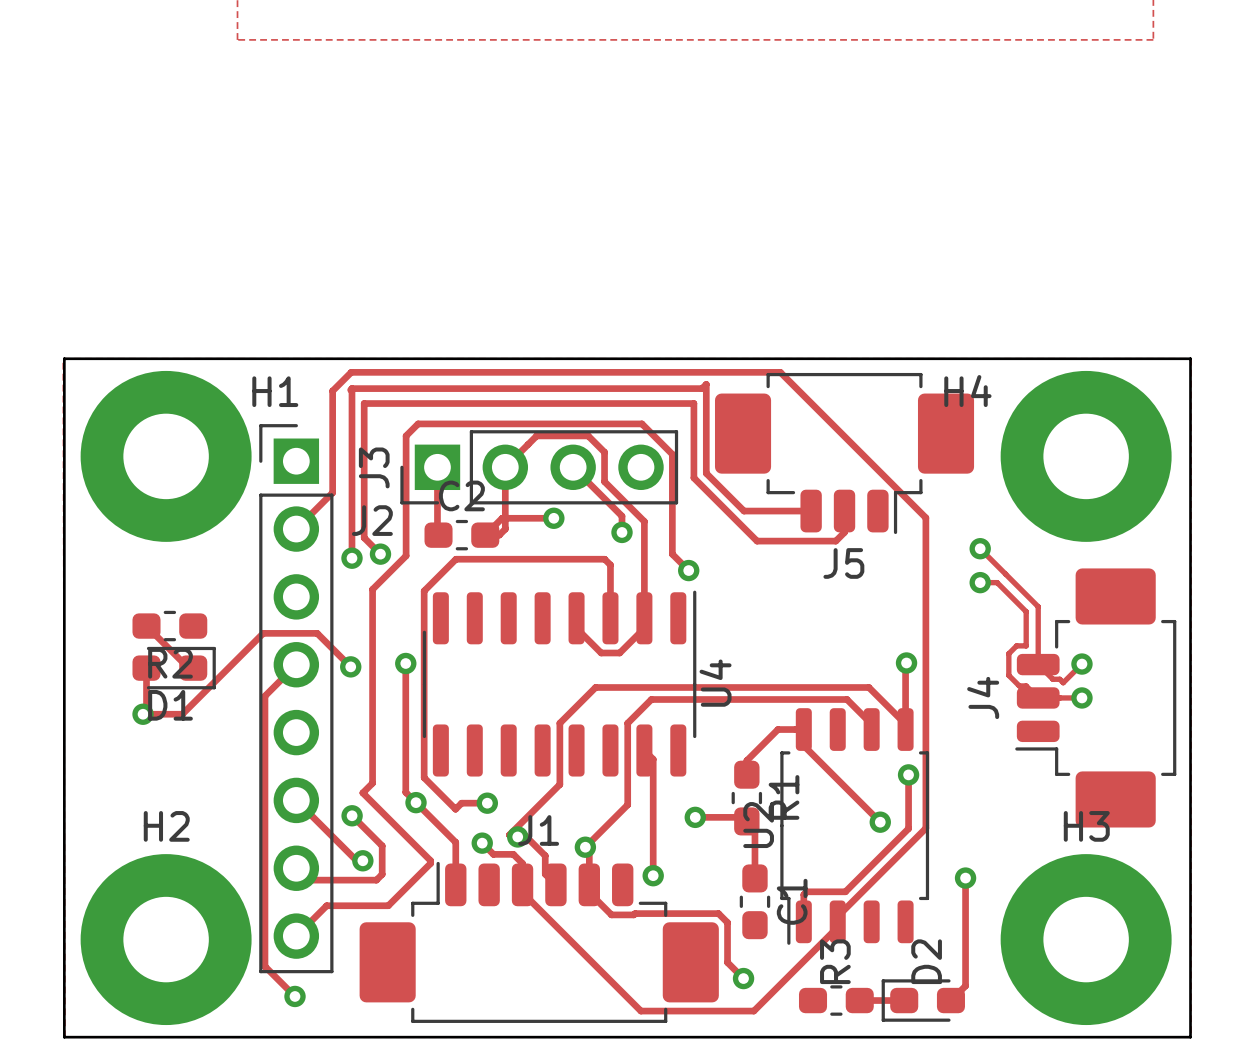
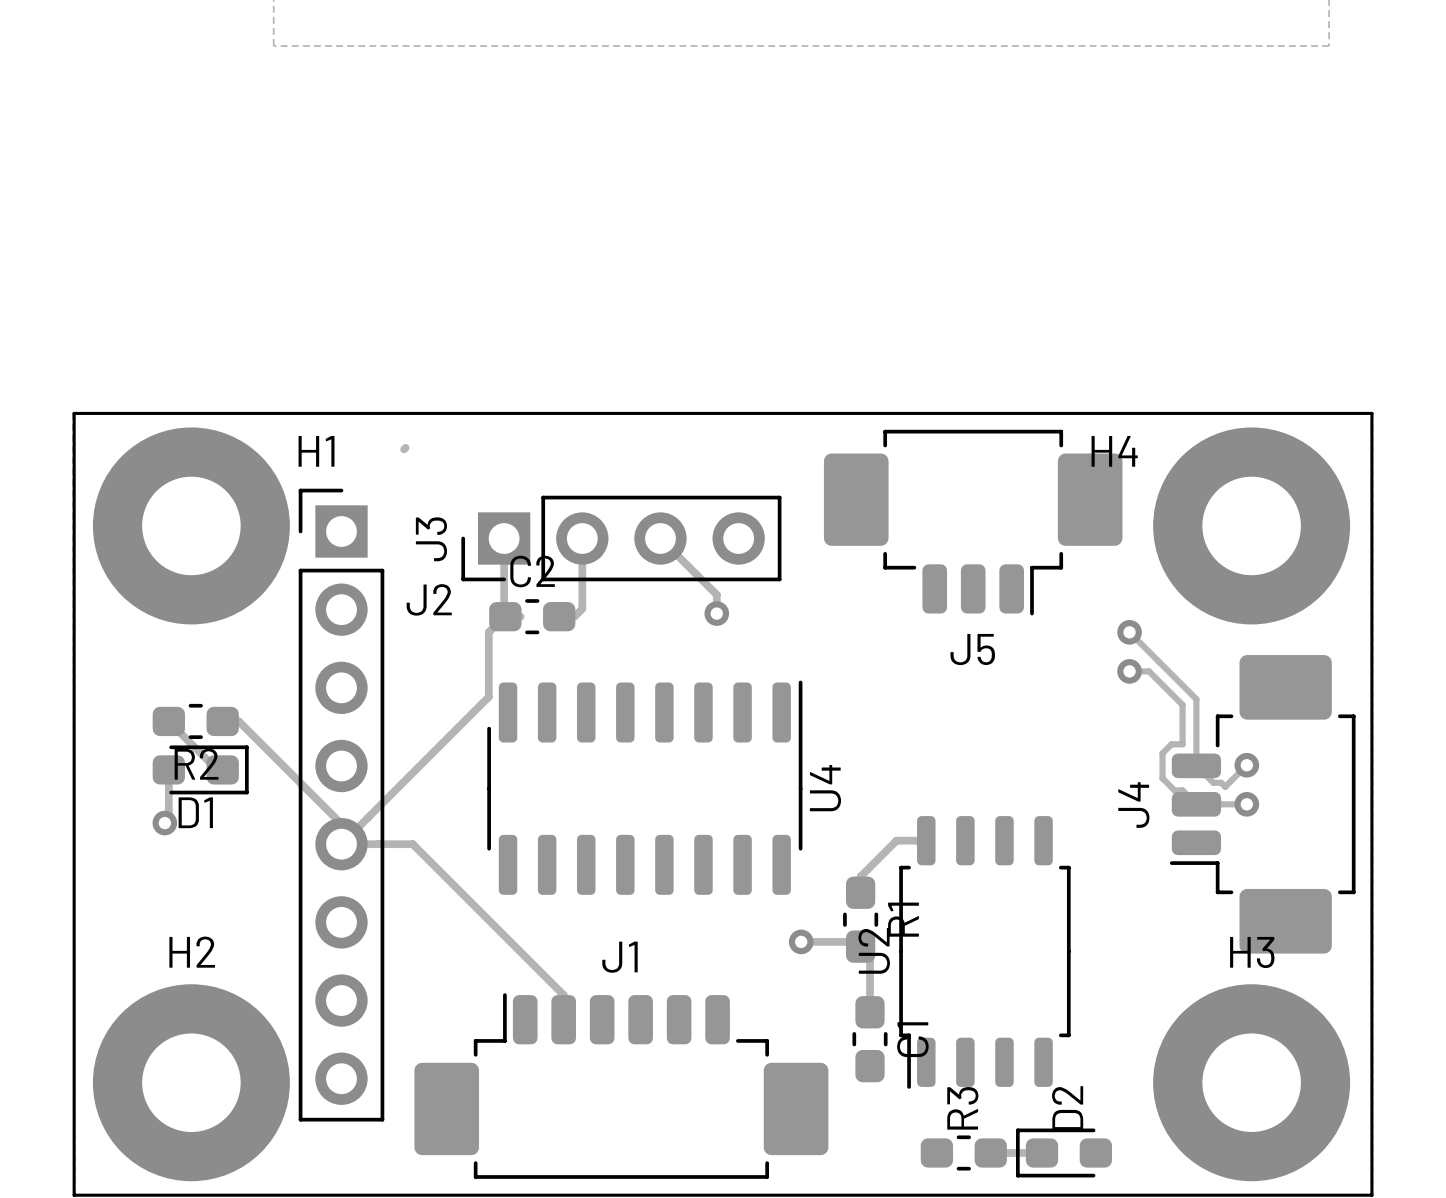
track: (505, 467) (536, 435) (588, 435) (604, 452) (604, 481) (644, 521) (644, 628) (619, 653) (601, 653) (576, 628) (576, 618) -> none
track: (811, 511) (744, 511) (706, 473) (706, 384) (702, 388) (351, 388) (351, 558) -> none
track: (844, 511) (844, 532) (835, 541) (757, 541) (693, 477) (693, 403) (364, 403) (364, 537) (380, 554) -> none
track: (553, 518) (502, 518) (485, 535) (499, 535) (505, 528) -> (574, 616) (582, 608)
via: (553, 518) -> none
track: (292, 529) (296, 529) (332, 492) (332, 390) (351, 372) (780, 372) (925, 517) (925, 828) (837, 916) (837, 927) (753, 1011) (640, 1011) (522, 892) (522, 863) (513, 854) (493, 854) (482, 843) -> none
via: (380, 554) -> none
via: (351, 558) -> none
track: (688, 570) (672, 554) (672, 454) (641, 423) (418, 423) (406, 435) (406, 555) (372, 589) (372, 783) (362, 792) (430, 860) (430, 863) (388, 905) (326, 905) (296, 936) -> none
via: (688, 570) -> none
track: (424, 591) (455, 559) (604, 559) (610, 564) (610, 618) -> (488, 681) (488, 632) (504, 616) (520, 616)
track: (424, 604) (424, 777) (455, 809) (461, 803) (487, 803) -> (488, 696) (341, 844) (412, 844) (563, 995) (563, 1019)
track: none -> (222, 721) (238, 721) (341, 824)
track: (906, 662) (905, 729) -> none
via: (906, 662) -> none
track: (405, 663) (405, 792) (455, 842) (455, 884) -> none
via: (405, 663) -> none
track: (296, 664) (264, 696) (264, 966) (295, 996) -> none
track: (350, 666) (317, 633) (263, 633) (182, 714) (143, 714) -> none
via: (350, 666) -> none
track: (905, 724) (868, 687) (595, 687) (559, 723) (559, 784) (509, 835) (524, 835) (545, 855) (545, 874) (555, 884) -> none
track: (803, 729) (803, 745) (880, 822) -> none
track: (871, 729) (871, 724) (846, 699) (651, 699) (627, 723) (627, 804) (585, 847) (589, 851) (589, 892) (611, 914) (718, 913) (727, 922) (727, 962) (743, 978) -> none
track: (644, 750) (653, 759) (653, 875) -> none
track: (908, 774) (908, 828) (845, 891) (806, 891) (803, 894) (803, 921) -> none
via: (908, 774) -> none
track: (296, 800) (362, 866) -> none
via: (416, 802) -> none
via: (487, 803) -> none
track: (352, 815) (382, 845) (382, 874) (376, 880) (308, 880) (296, 868) -> none
via: (352, 815) -> none
via: (880, 822) -> none
via: (517, 836) -> none
via: (482, 843) -> none
via: (585, 847) -> none
via: (362, 860) -> none
via: (653, 875) -> none
track: (965, 878) (965, 985) (950, 1000) -> none
via: (965, 878) -> none
via: (743, 978) -> none
via: (295, 996) -> none

